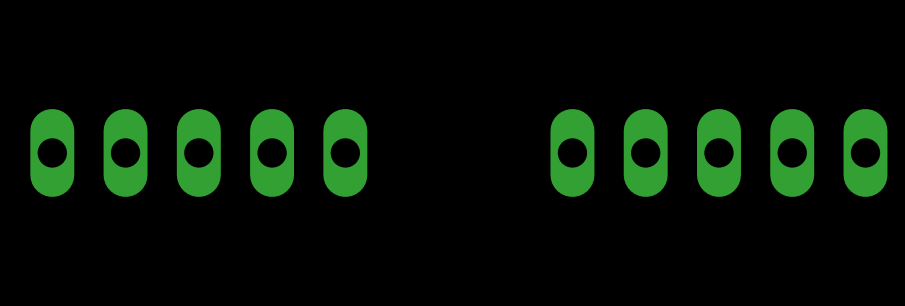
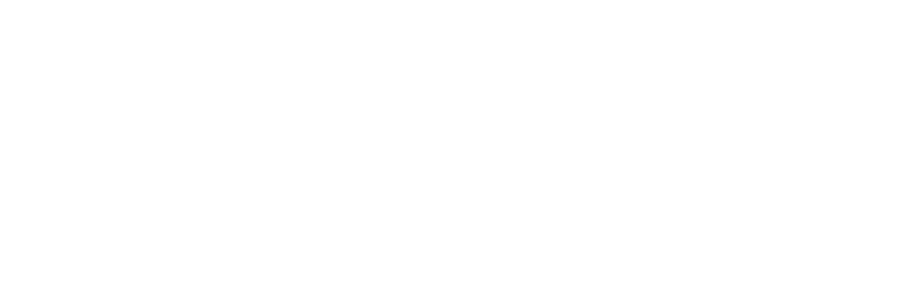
part: (198, 152) -> none
part: (718, 152) -> none

